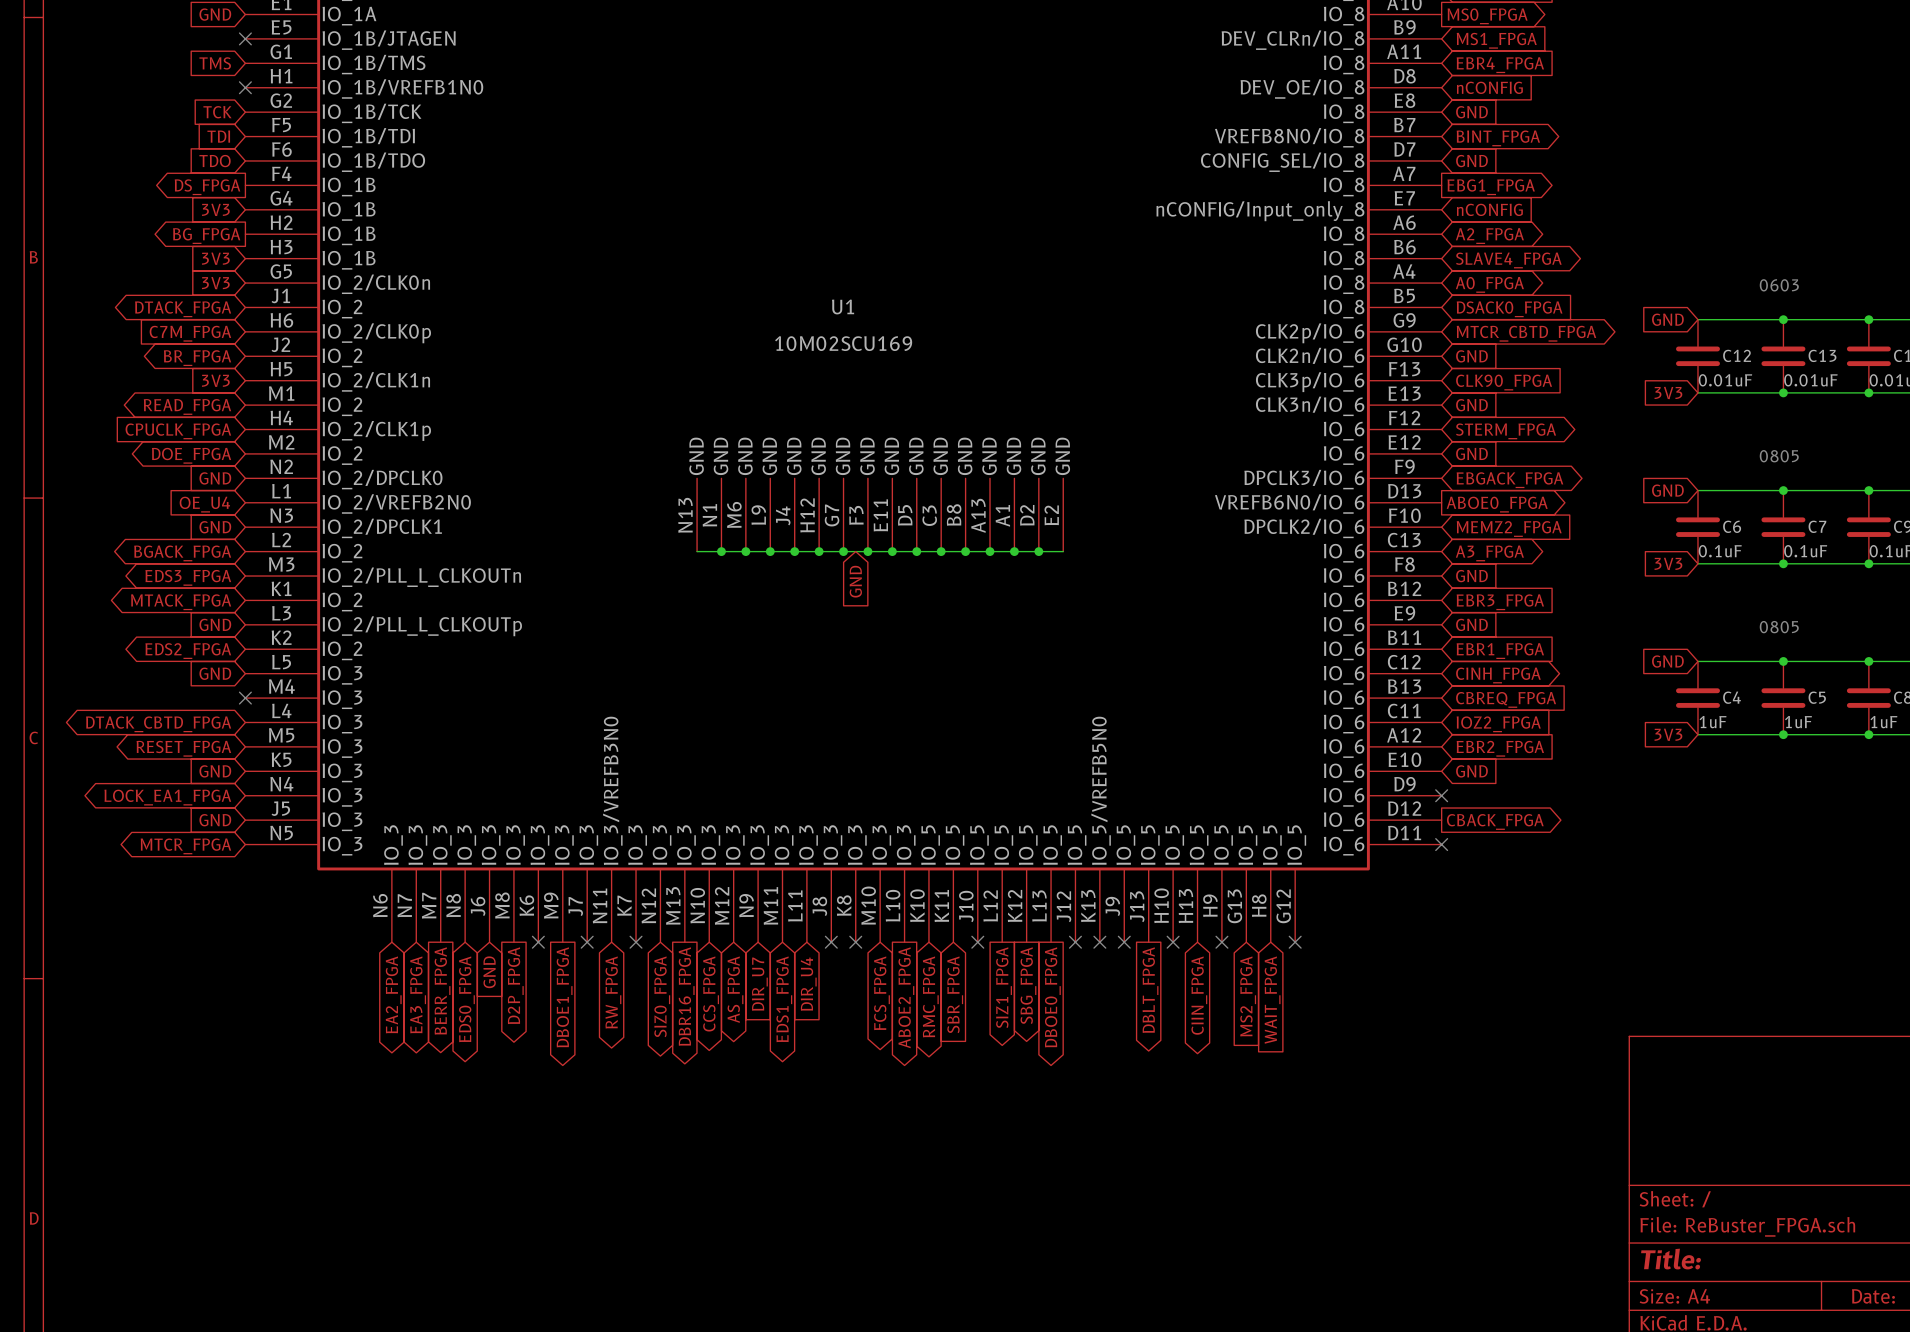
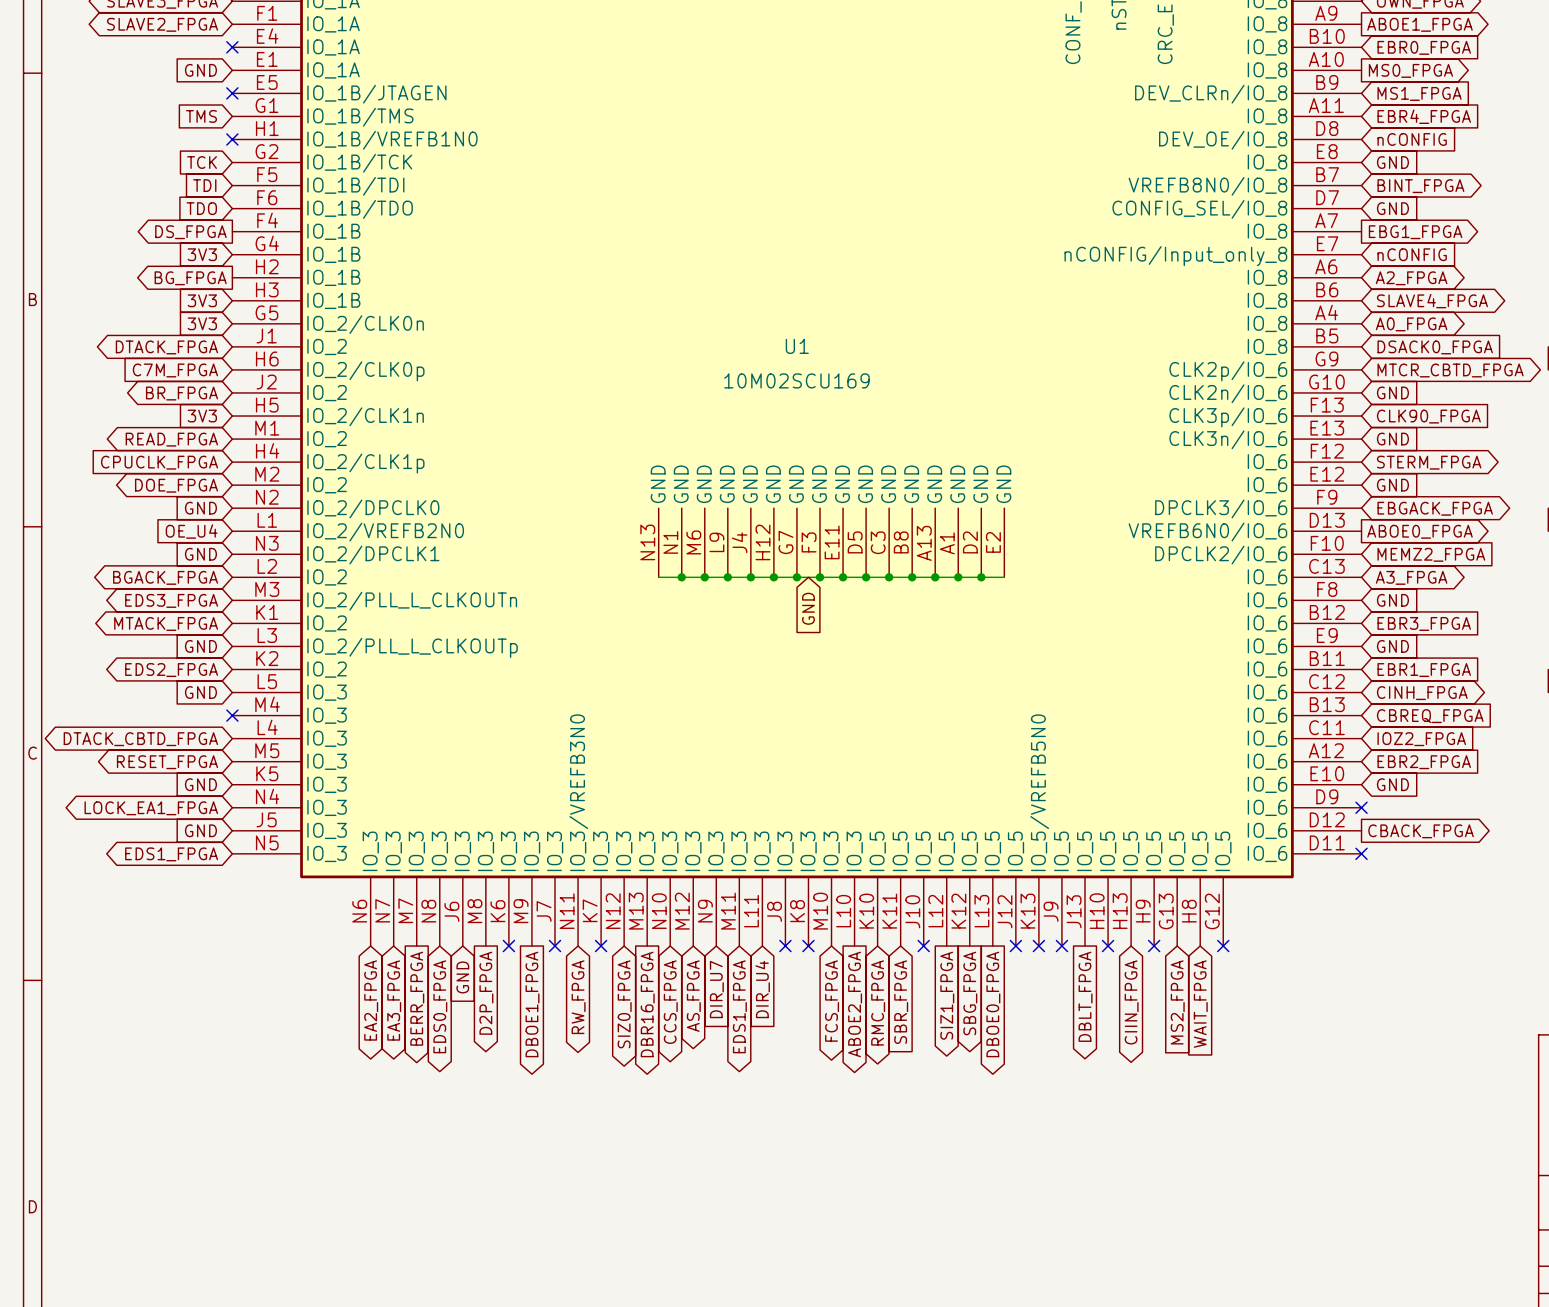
global label: MTCR_FPGA (185, 846) -> EDS1_FPGA (171, 854)

